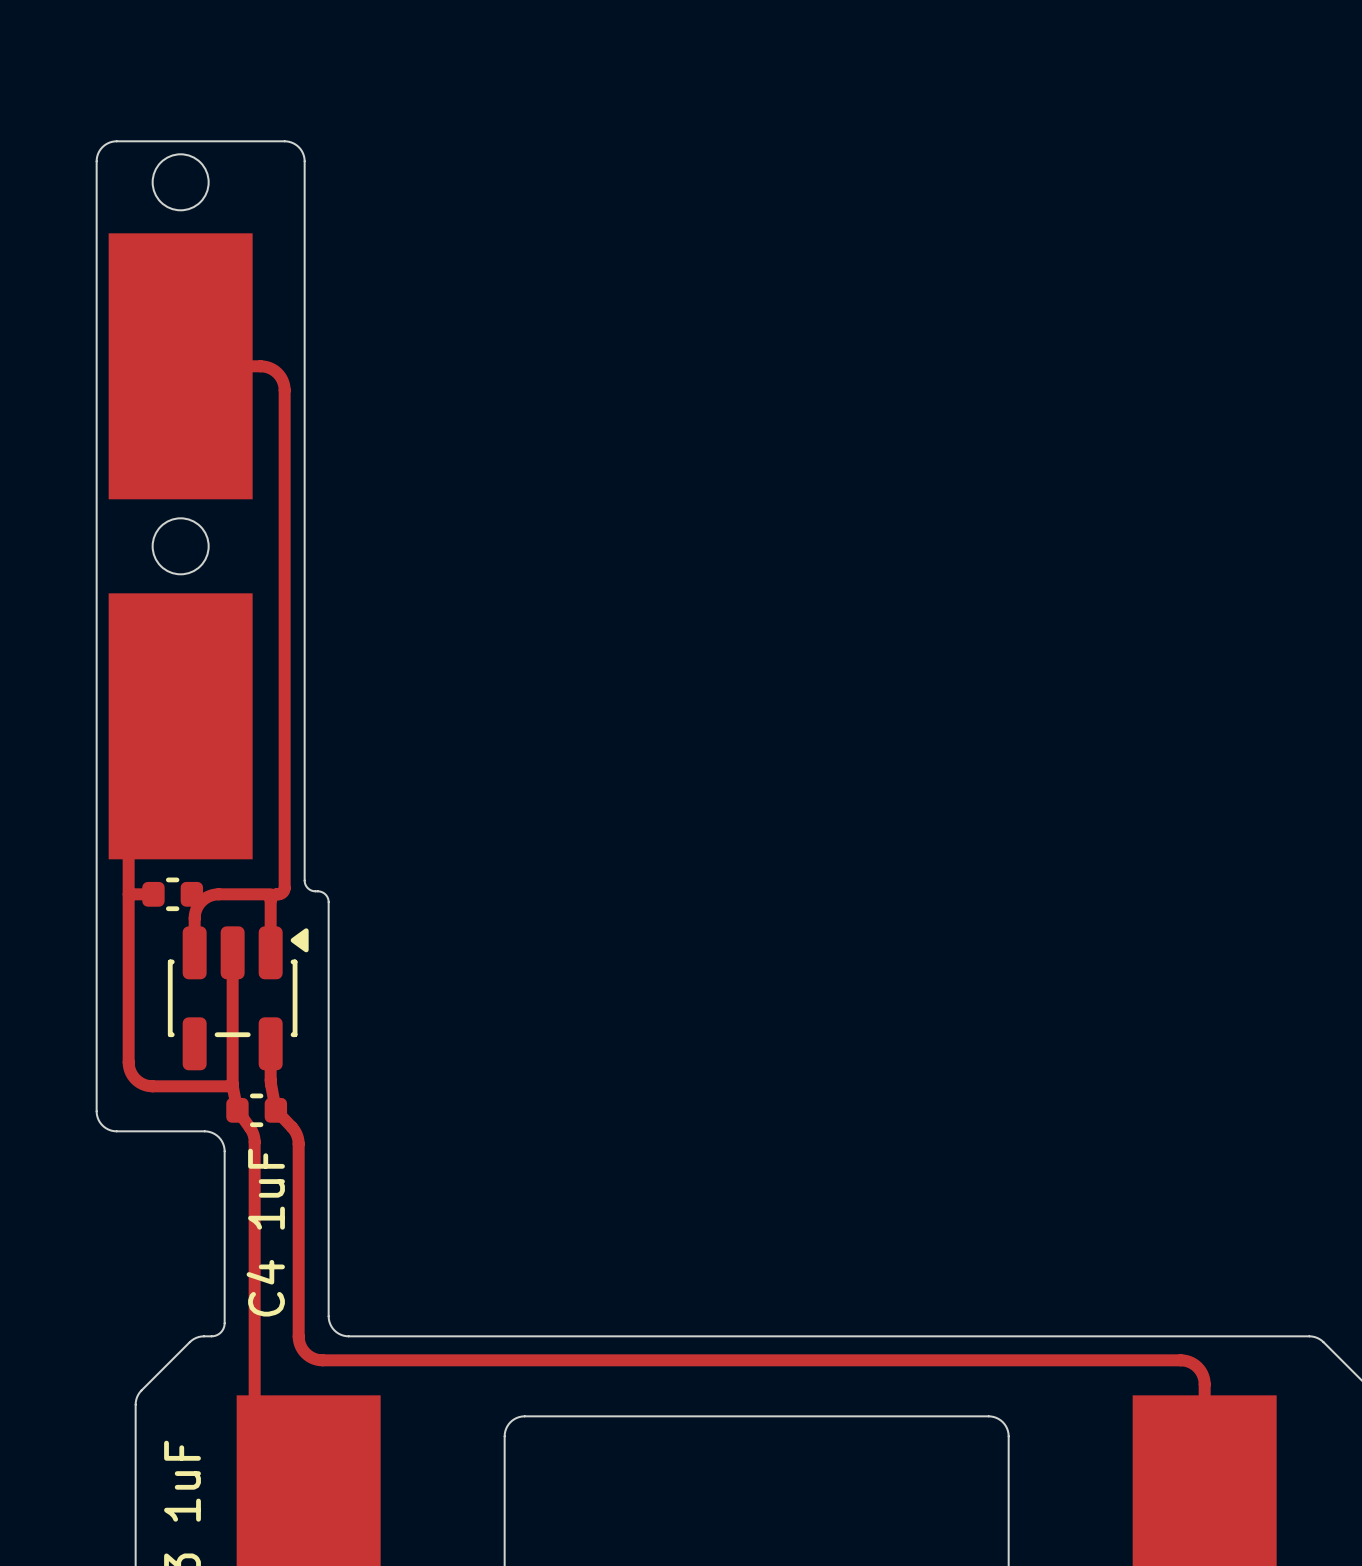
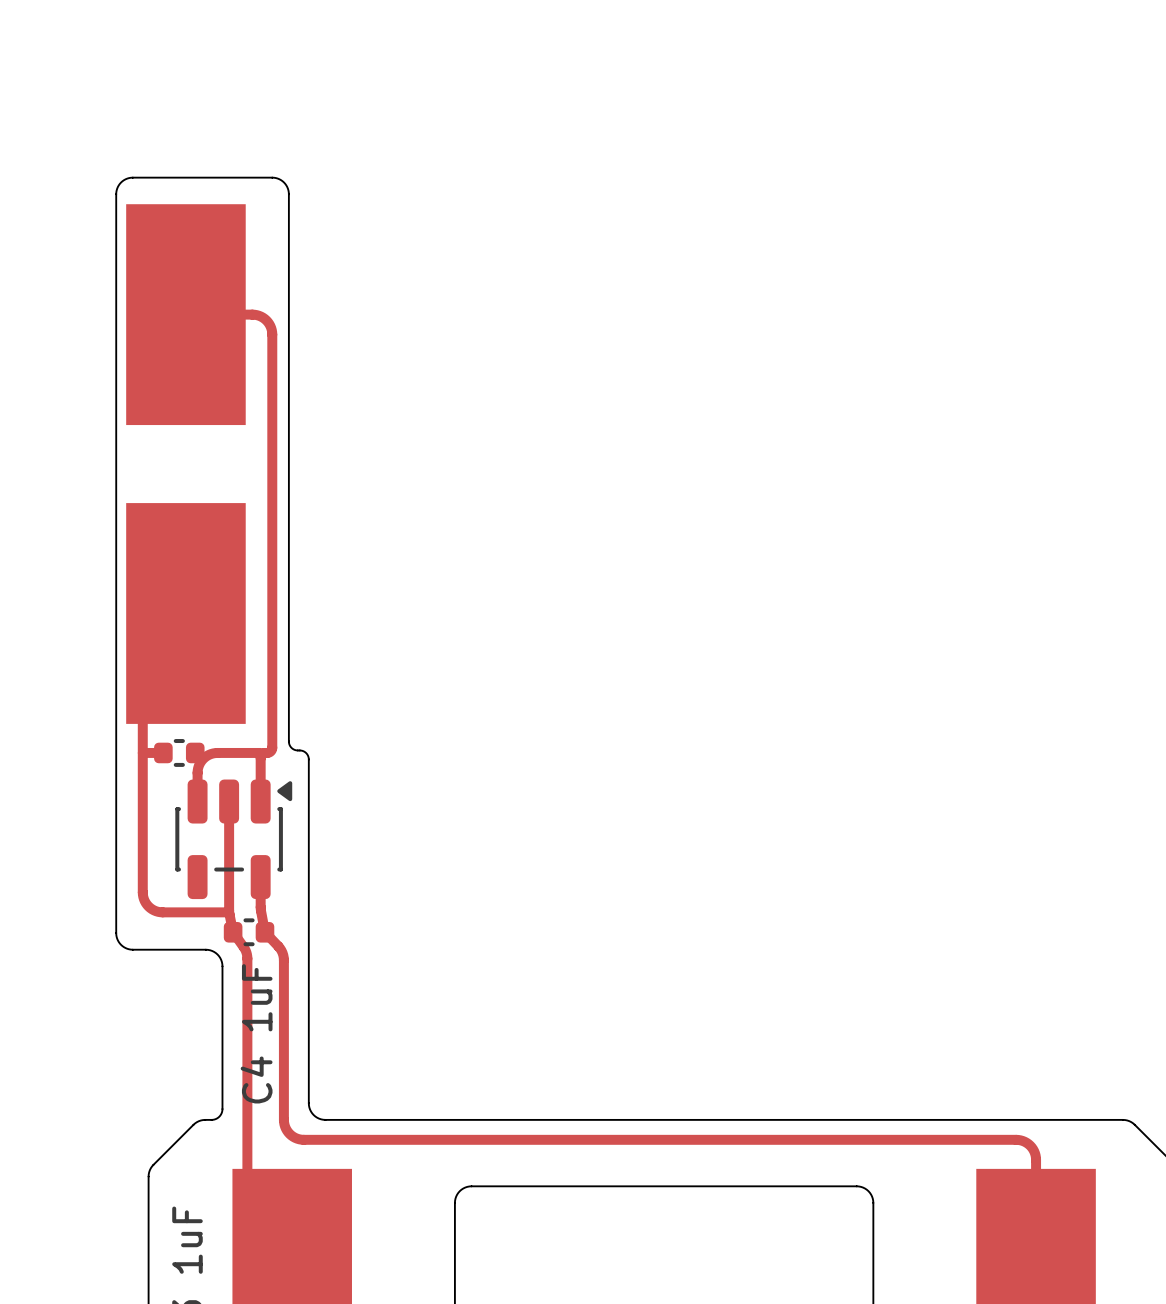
round board edge: [151, 153, 210, 212] -> none
board edge: (96, 221) (97, 156) (104, 145) (116, 141) (284, 141) (293, 143) (300, 148) (304, 159) (304, 221) -> (116, 194) (121, 182) (132, 177) (274, 177) (284, 182) (288, 194)
round board edge: [151, 517, 210, 576] -> none

